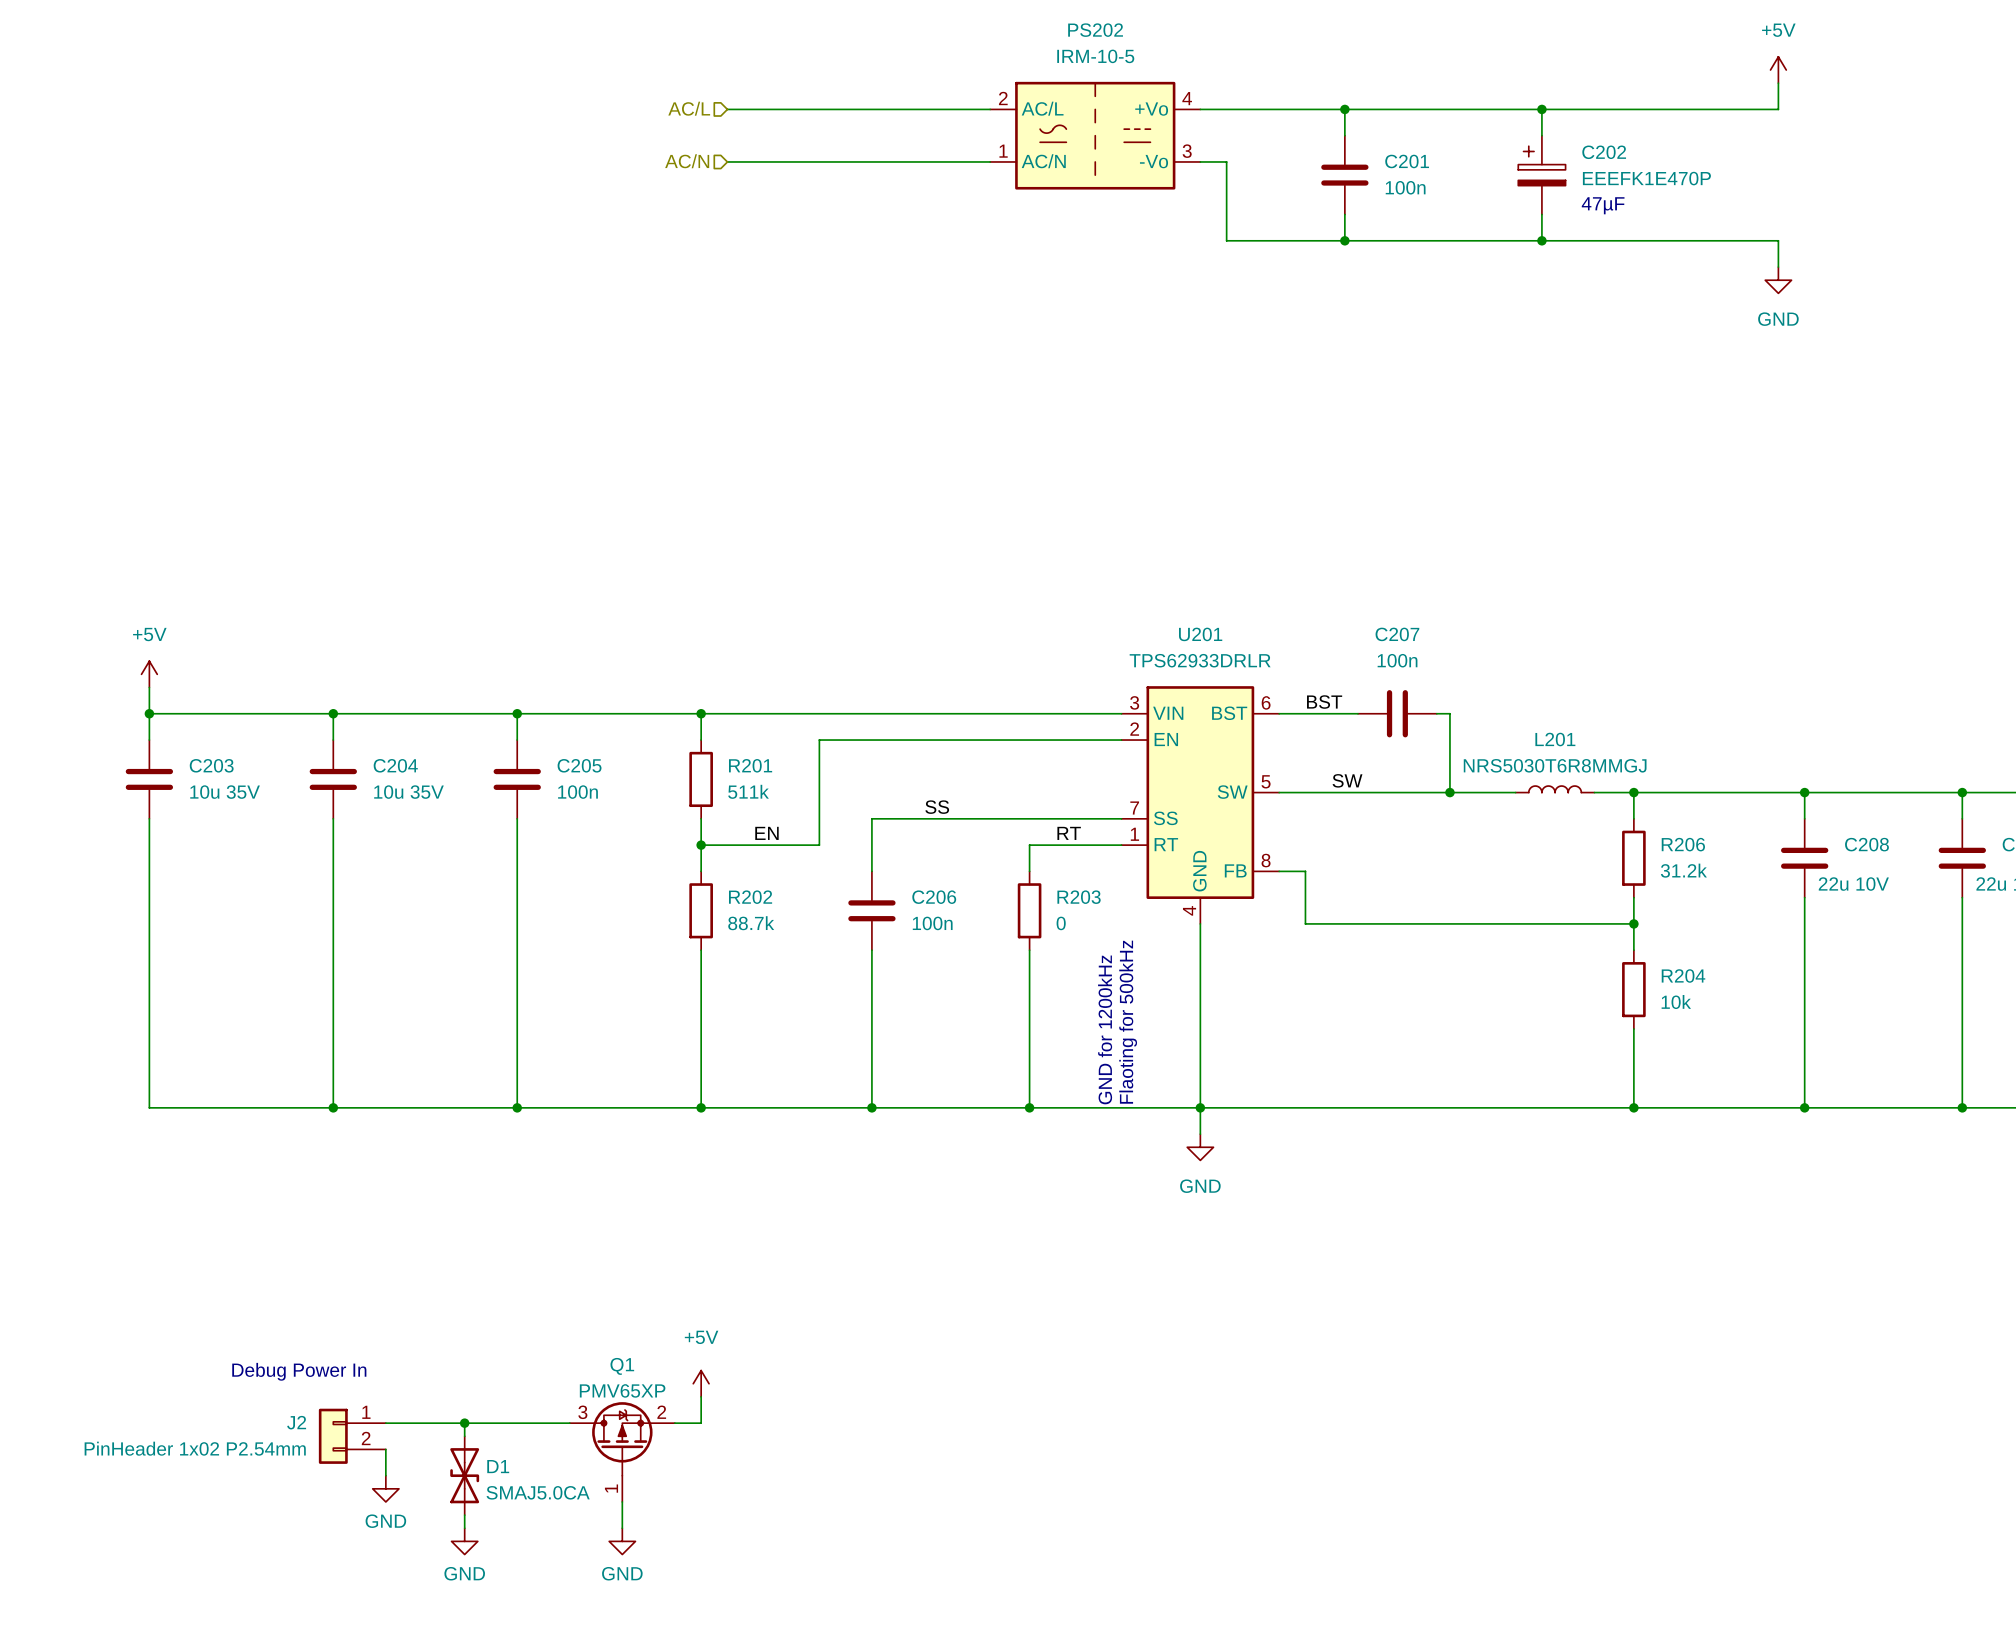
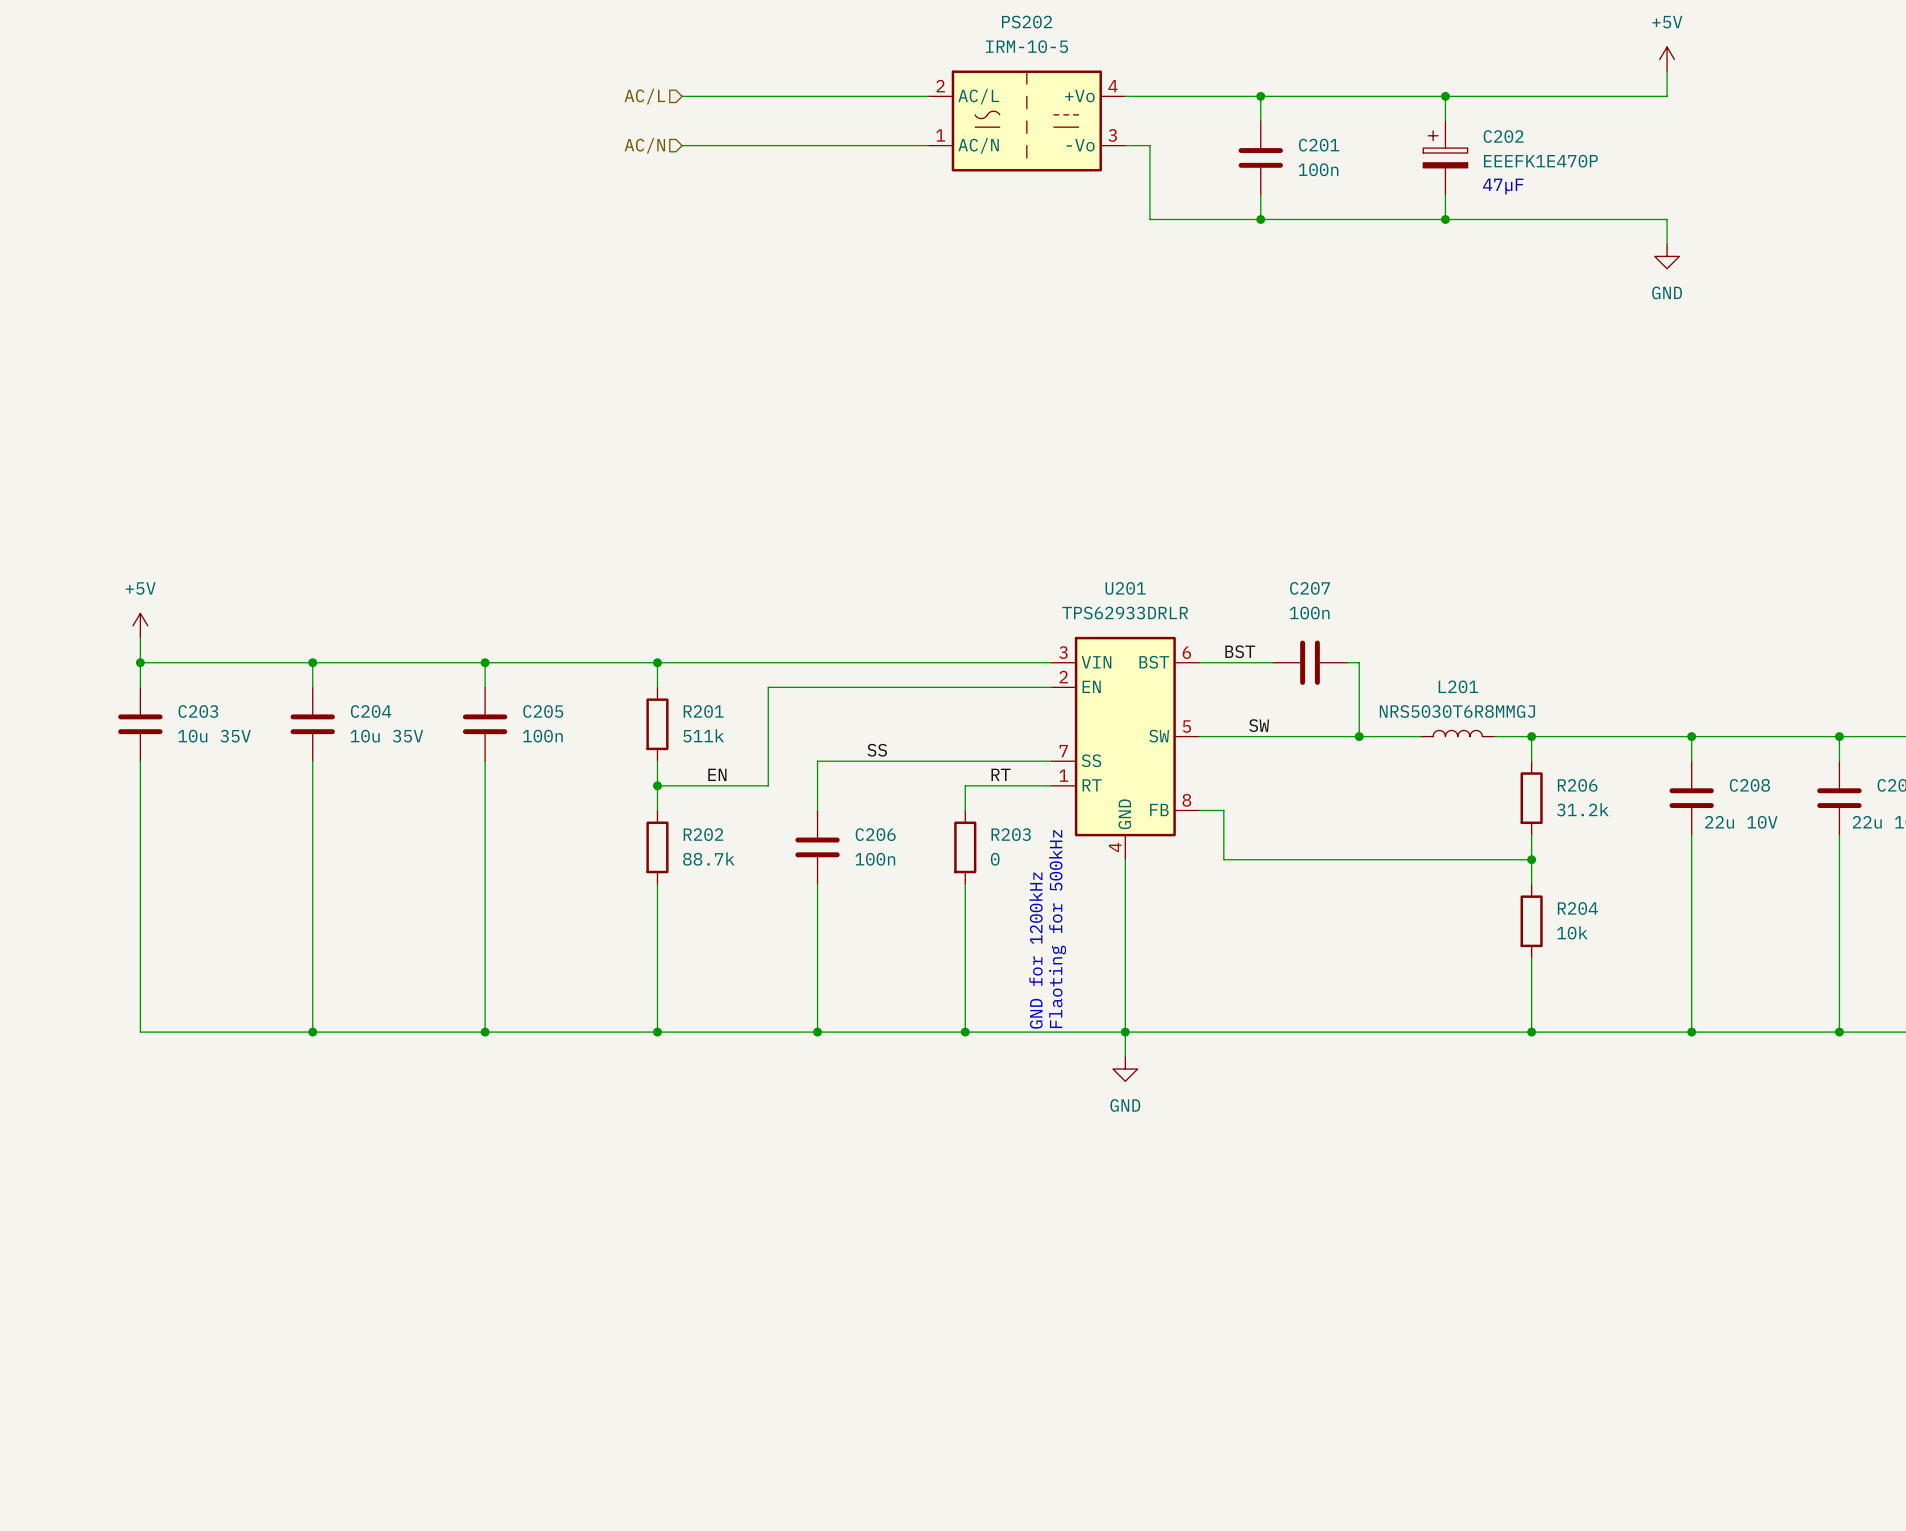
text: Debug Power In (299, 1371) -> none
power symbol: +5V (701, 1383) -> none
wire: (701, 1396) (701, 1423) (674, 1423) -> none
wire: (385, 1423) (569, 1423) -> none
wire: (464, 1423) (464, 1436) -> none
junction: (464, 1423) -> none
J2: PinHeader 1x02 P2.54mm (352, 1436) -> none
wire: (385, 1449) (385, 1475) -> none
Q1: PMV65XP (622, 1452) -> none
D1: SMAJ5.0CA (464, 1475) -> none
power symbol: GND (385, 1488) -> none
wire: (622, 1501) (622, 1528) -> none
wire: (464, 1515) (464, 1528) -> none
power symbol: GND (464, 1541) -> none
power symbol: GND (622, 1541) -> none

